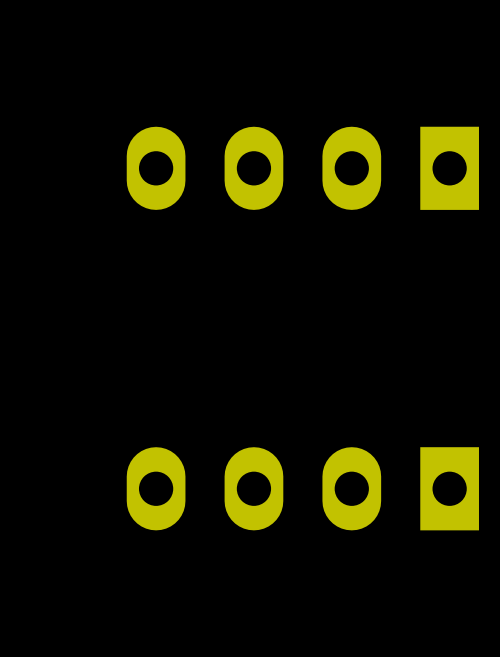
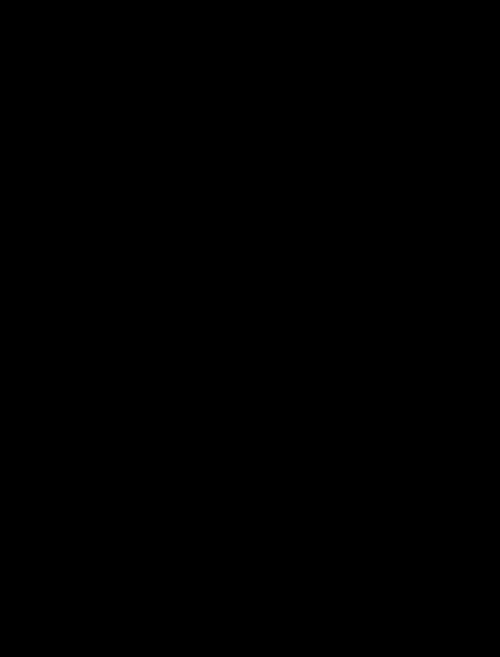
part: (302, 168) -> none
part: (302, 488) -> none

